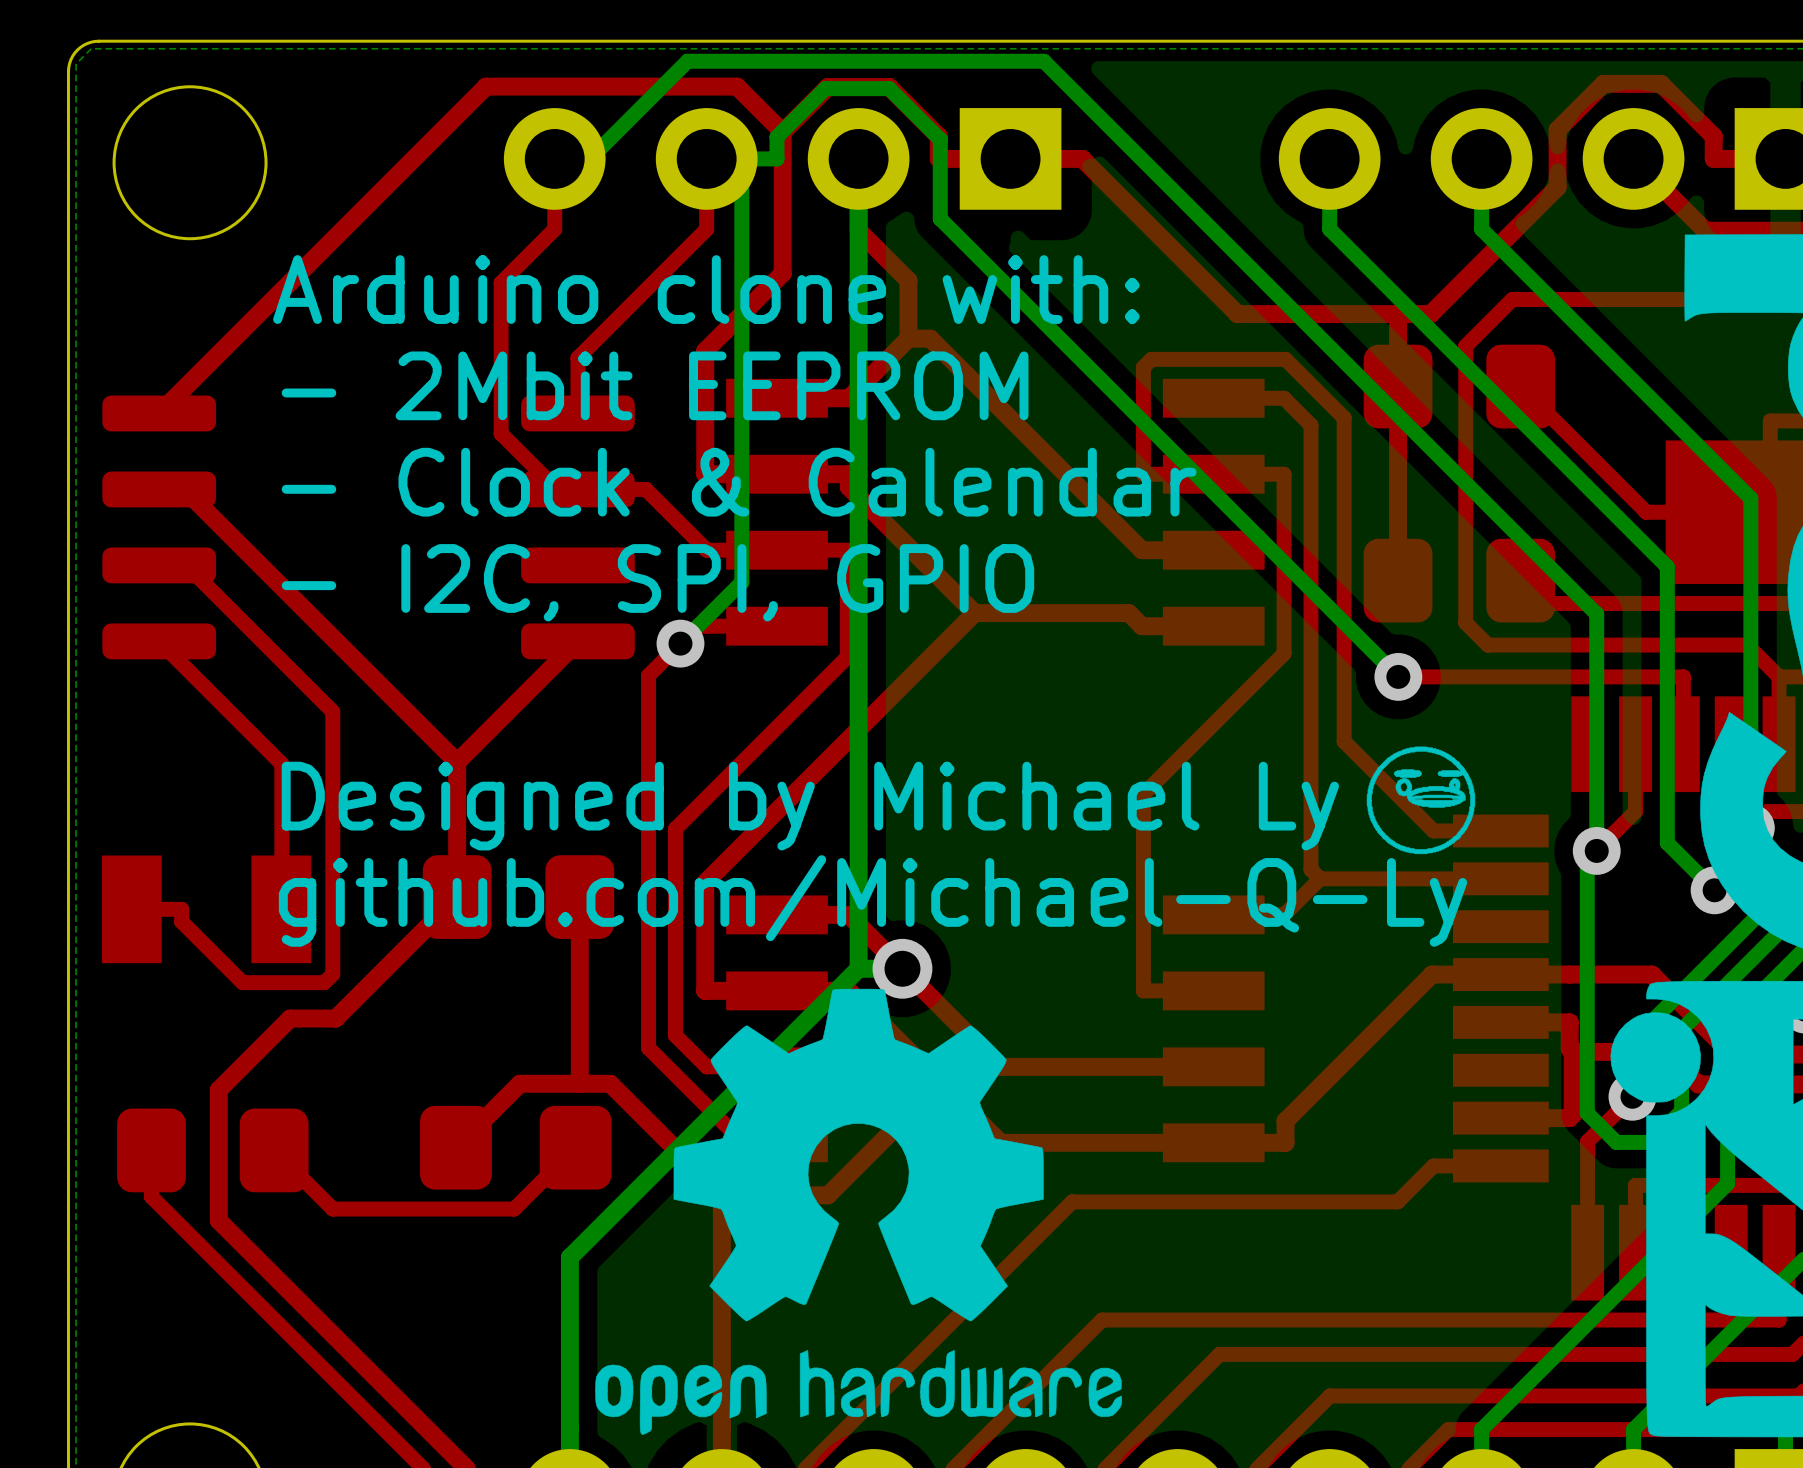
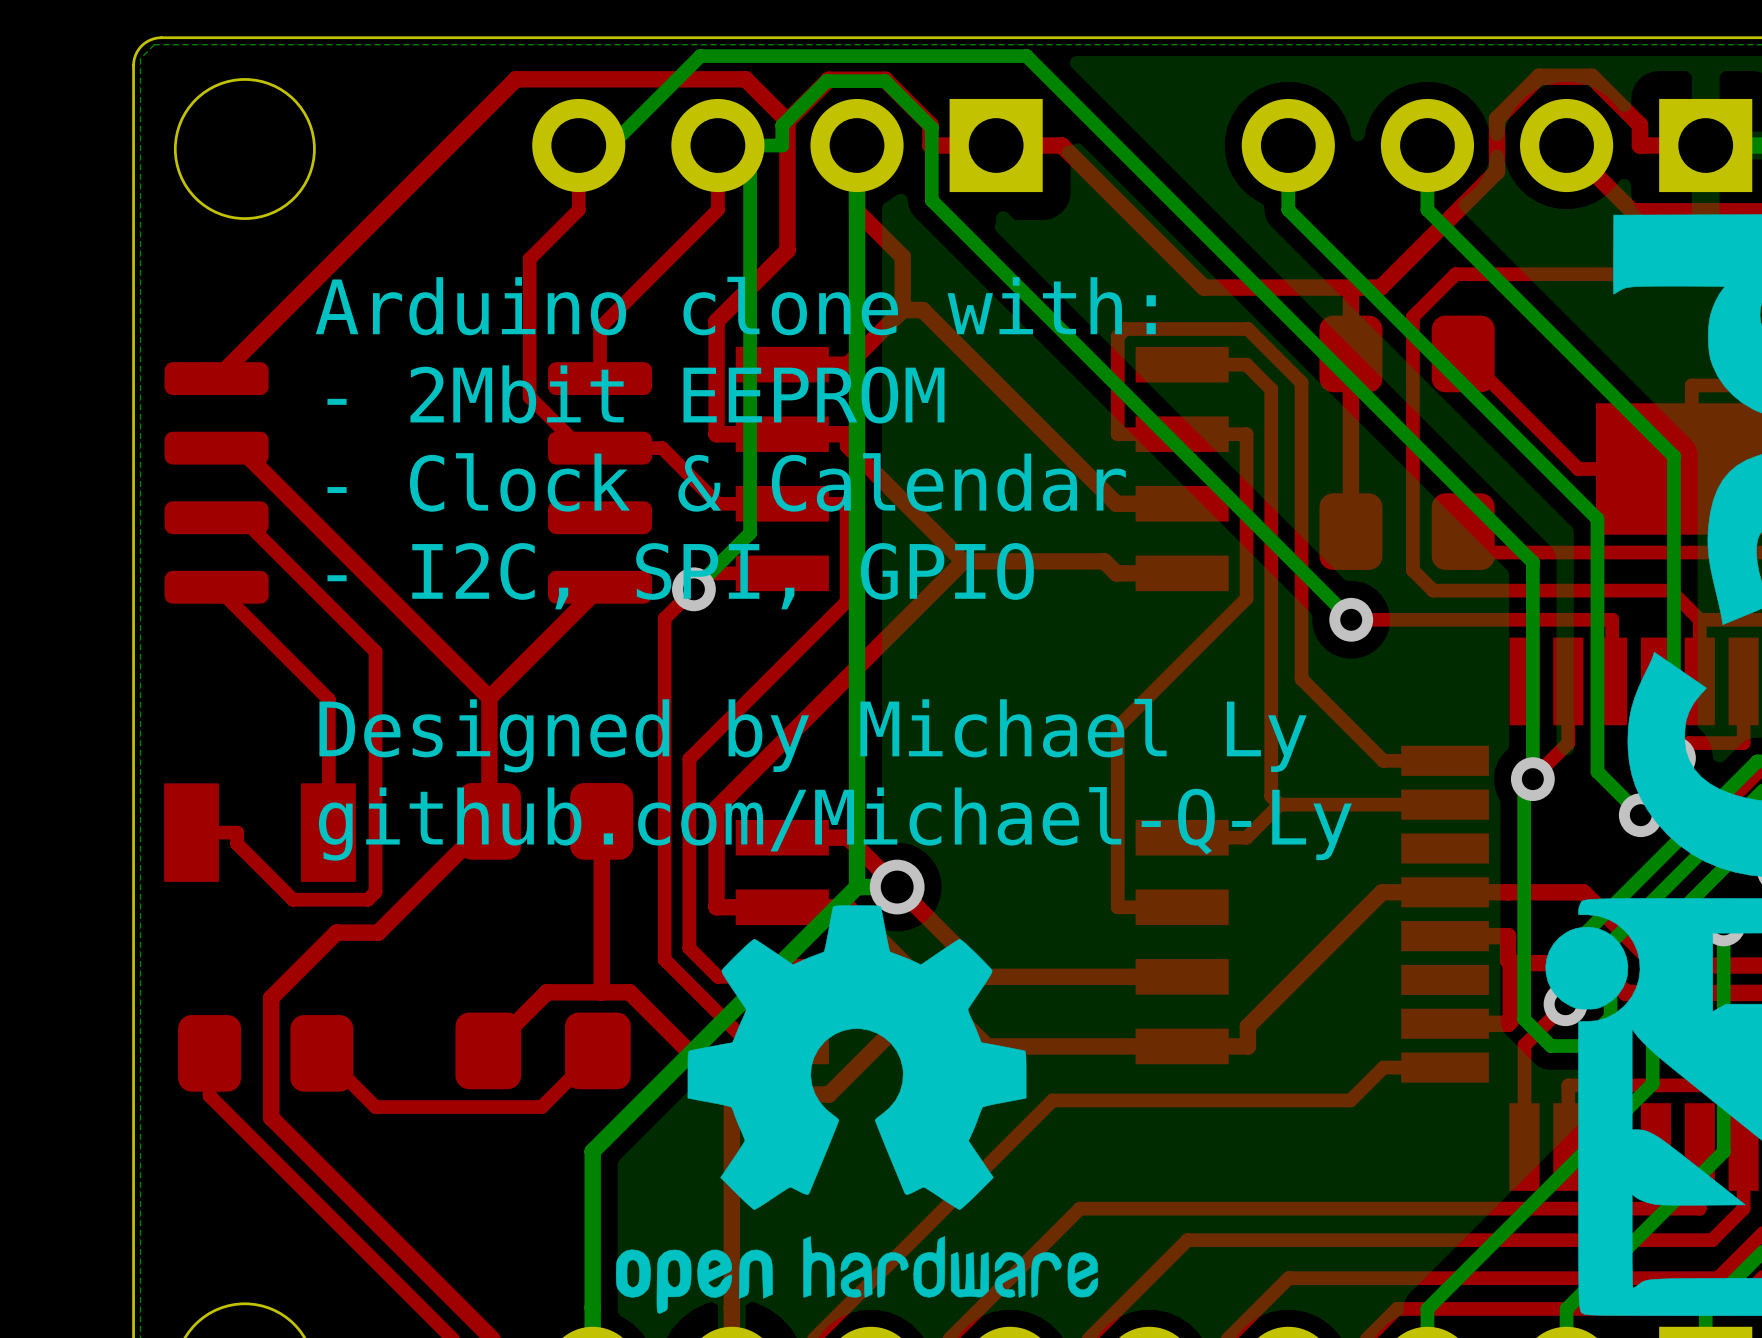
text position: Arduino clone with: (706, 289) -> Arduino clone with: (735, 306)
text position: - 2Mbit EEPROM (655, 385) -> - 2Mbit EEPROM (635, 394)
text position: - Clock & Calendar (739, 482) -> - Clock & Calendar (726, 482)
text position: - I2C, SPI, GPIO (657, 582) -> - I2C, SPI, GPIO (680, 576)
drawing: [1366, 746, 1476, 855] -> none

